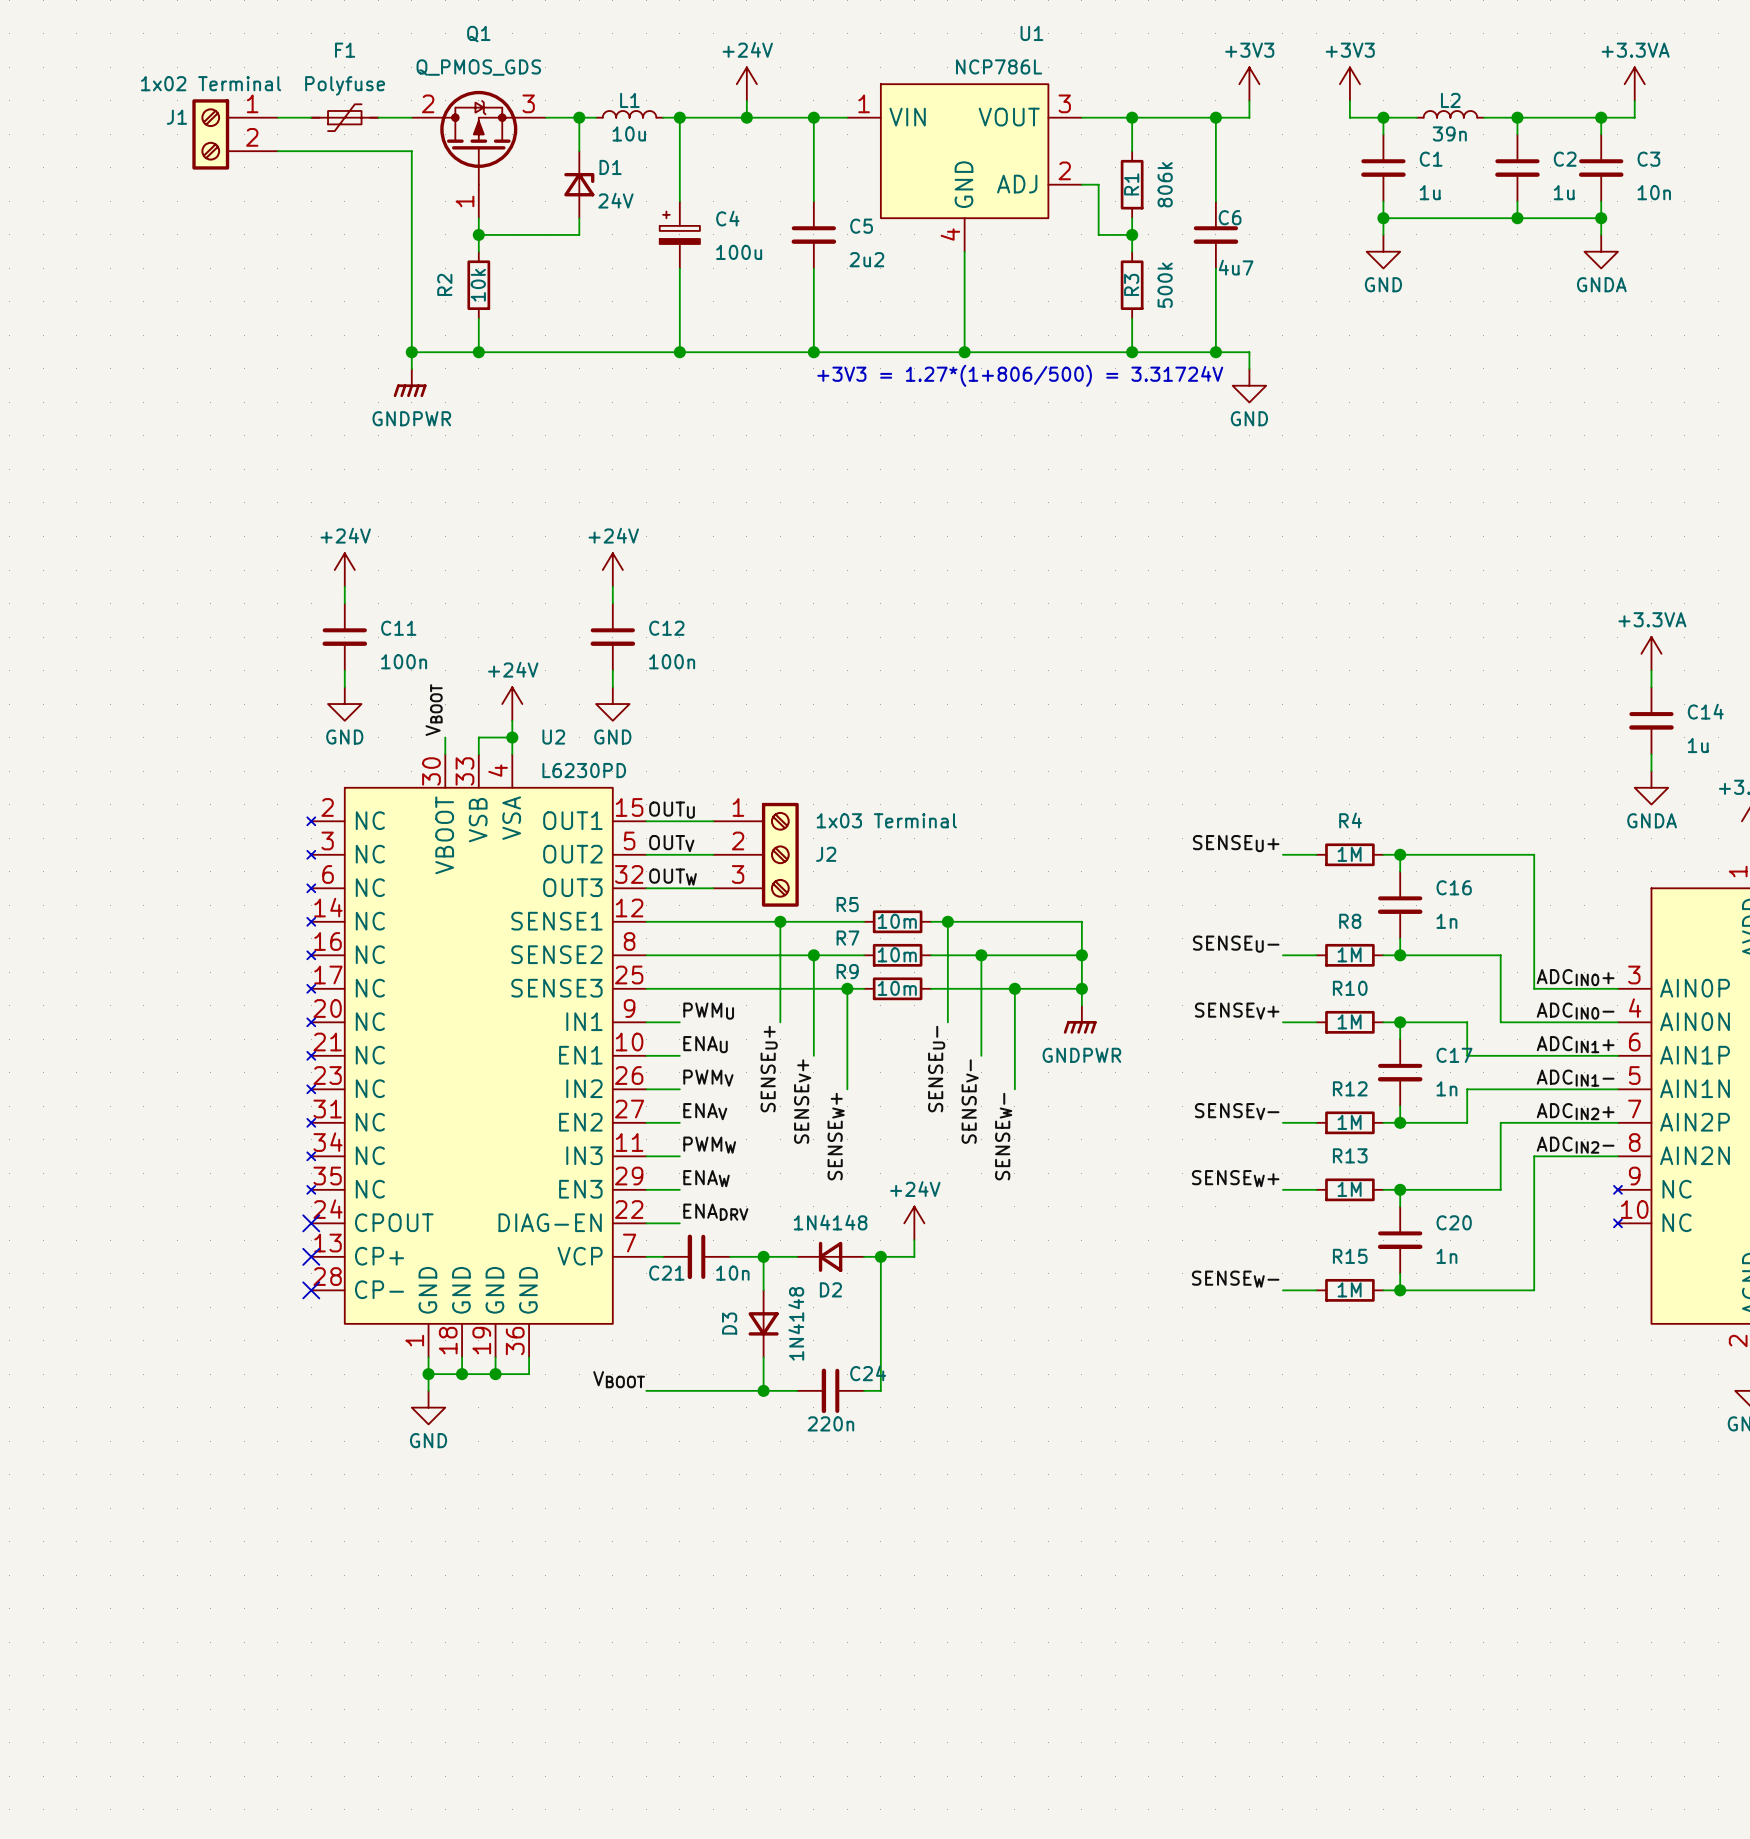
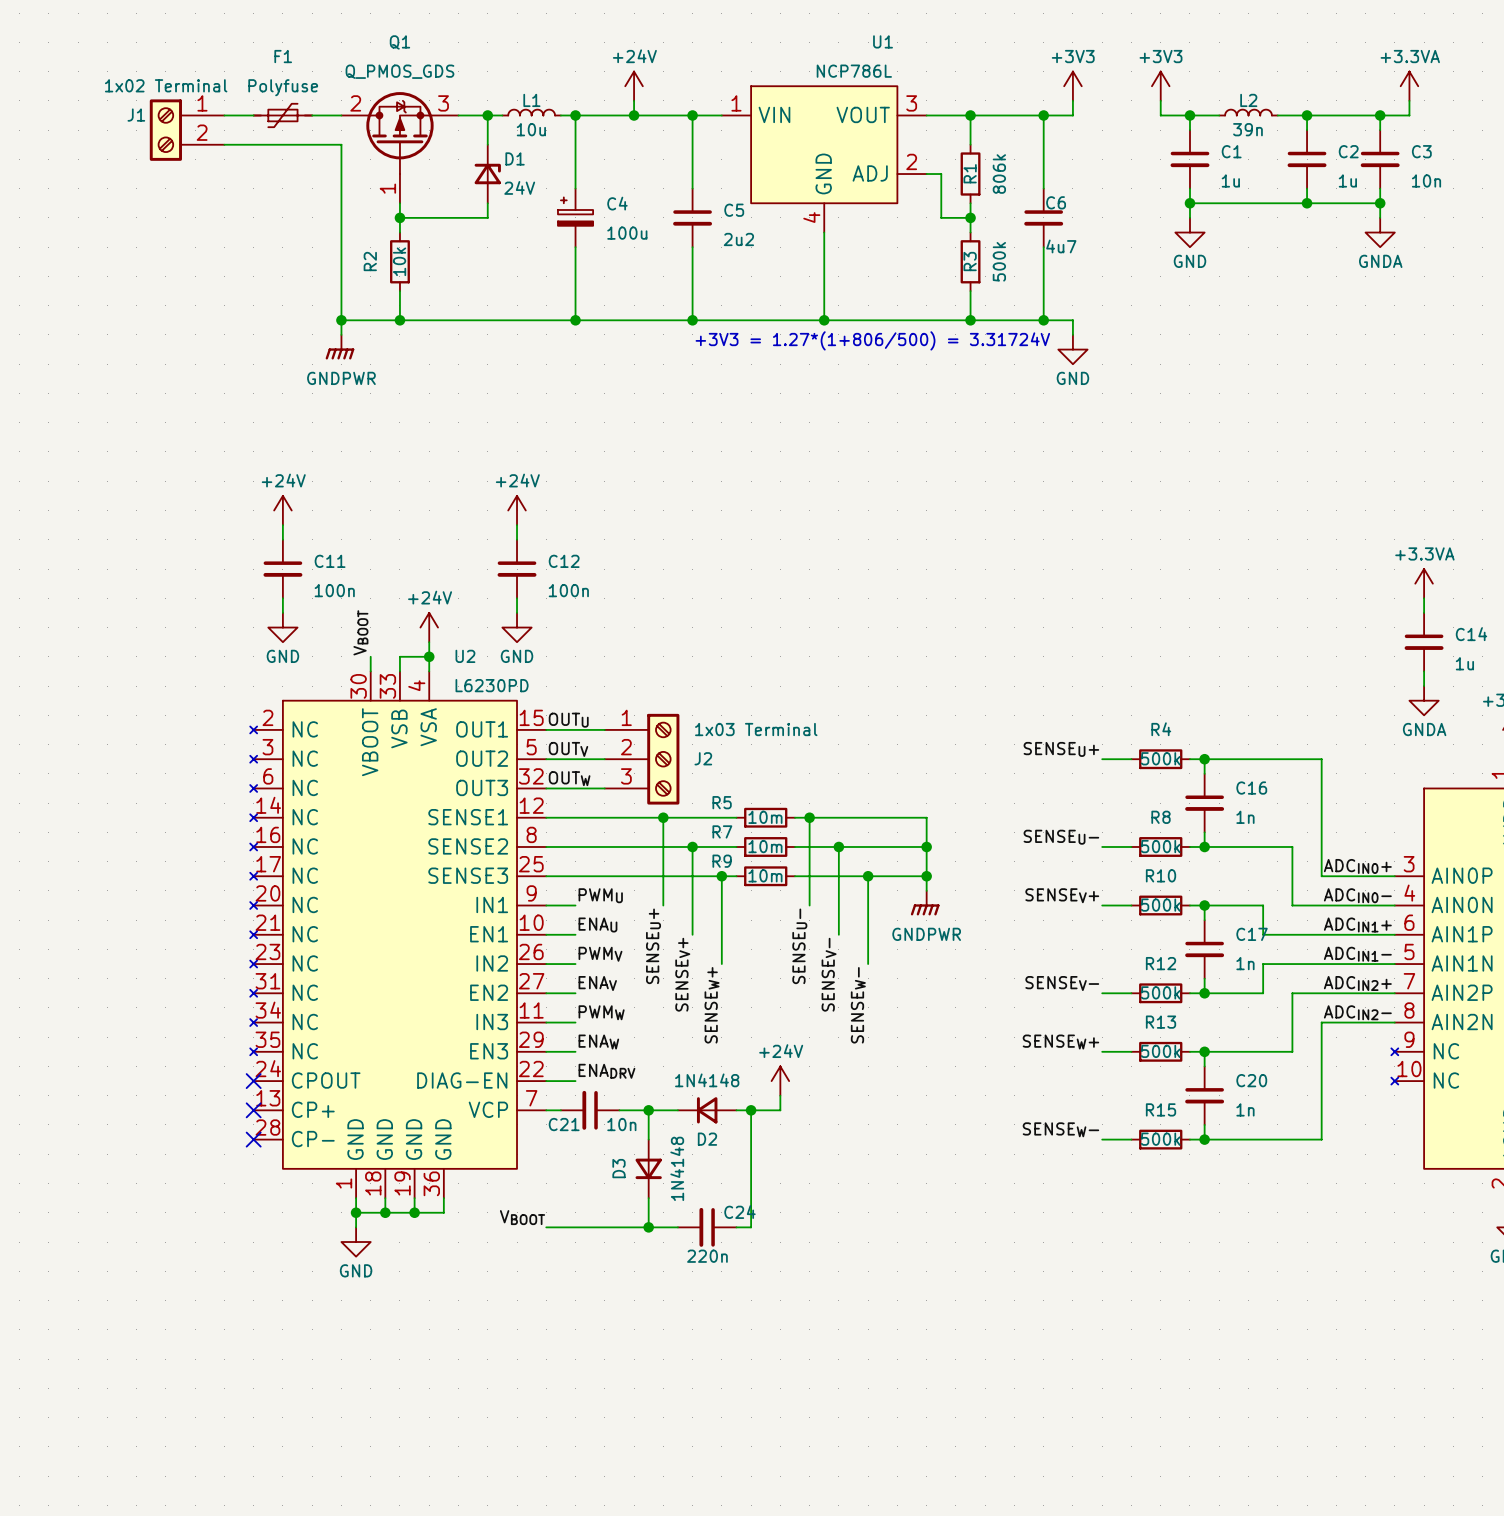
R4 value: 1M (1349, 854) -> 500k (1160, 758)
R8 value: 1M (1349, 954) -> 500k (1160, 846)
R10 value: 1M (1349, 1021) -> 500k (1160, 905)
R12 value: 1M (1349, 1122) -> 500k (1160, 992)
R13 value: 1M (1349, 1189) -> 500k (1160, 1051)
R15 value: 1M (1349, 1289) -> 500k (1160, 1139)

